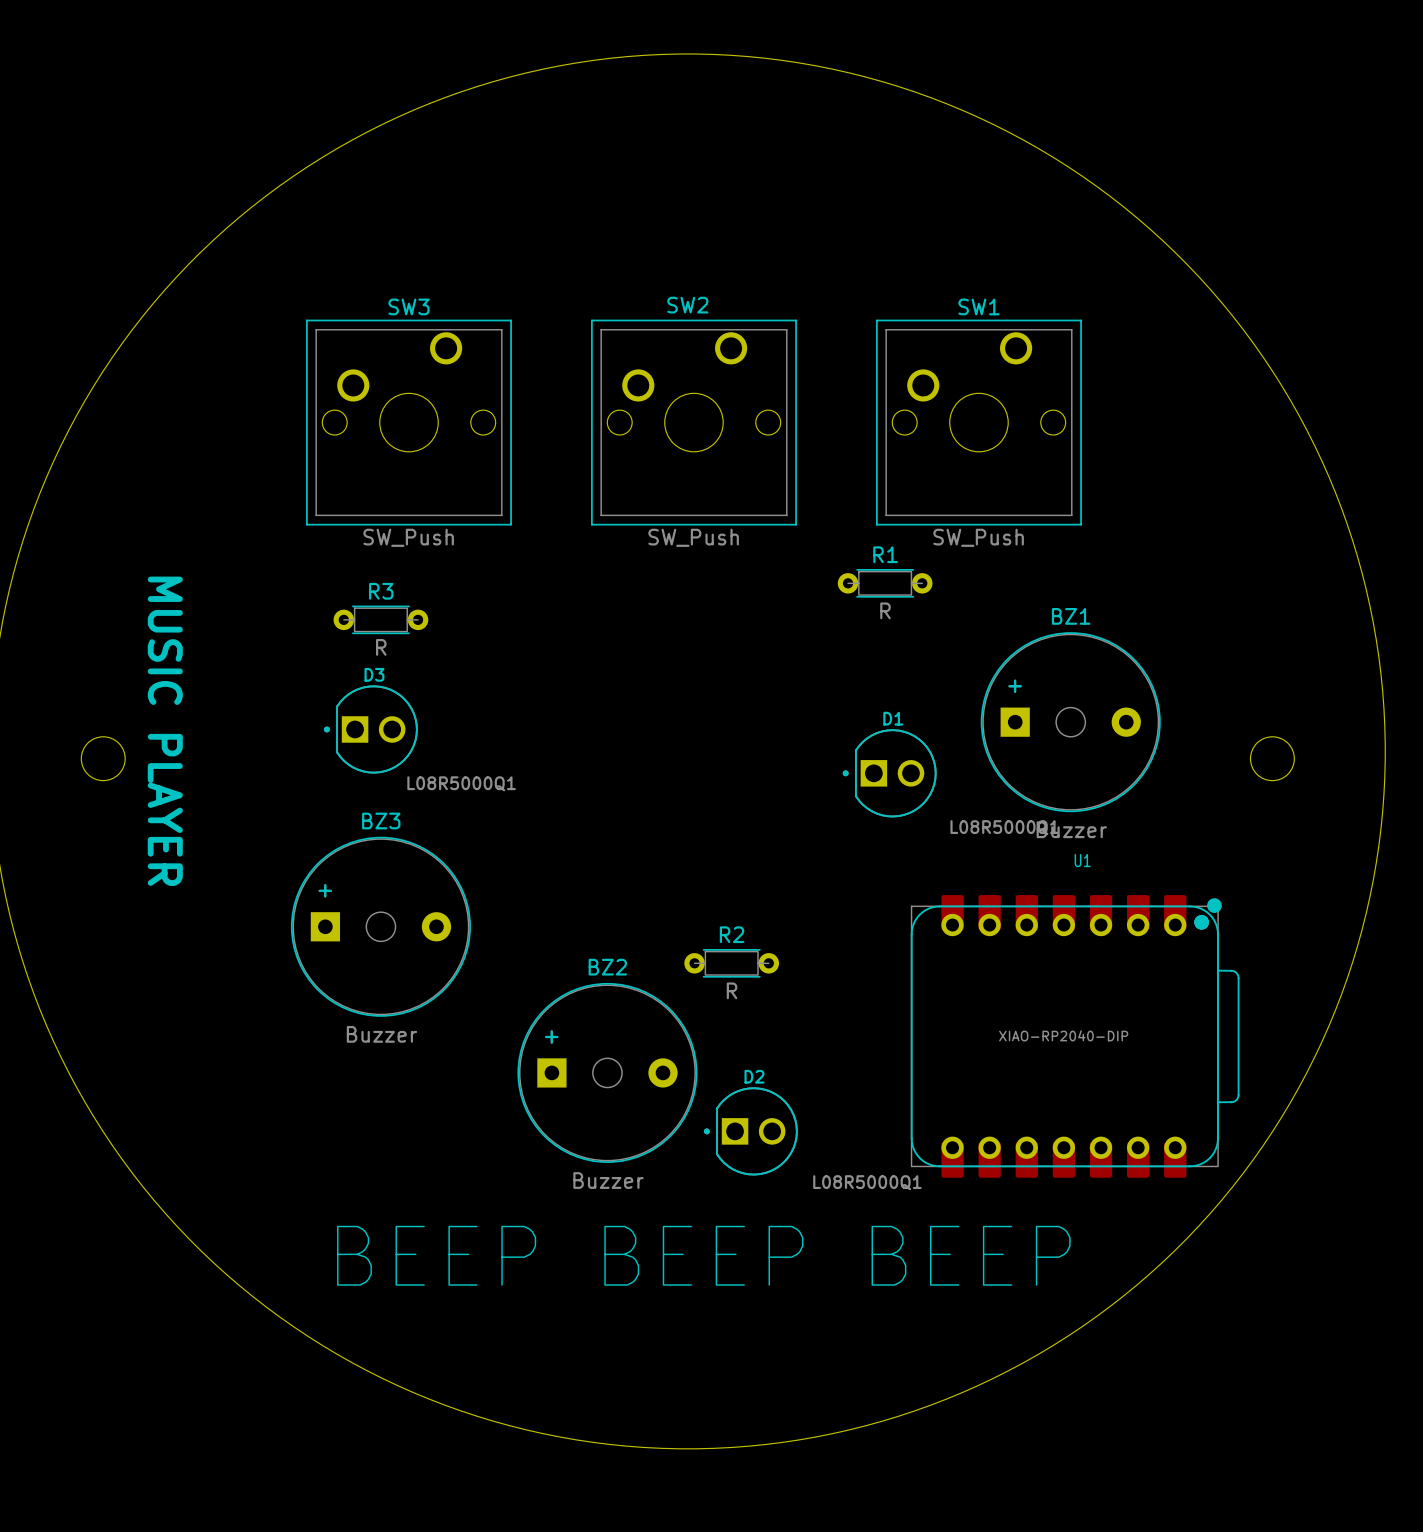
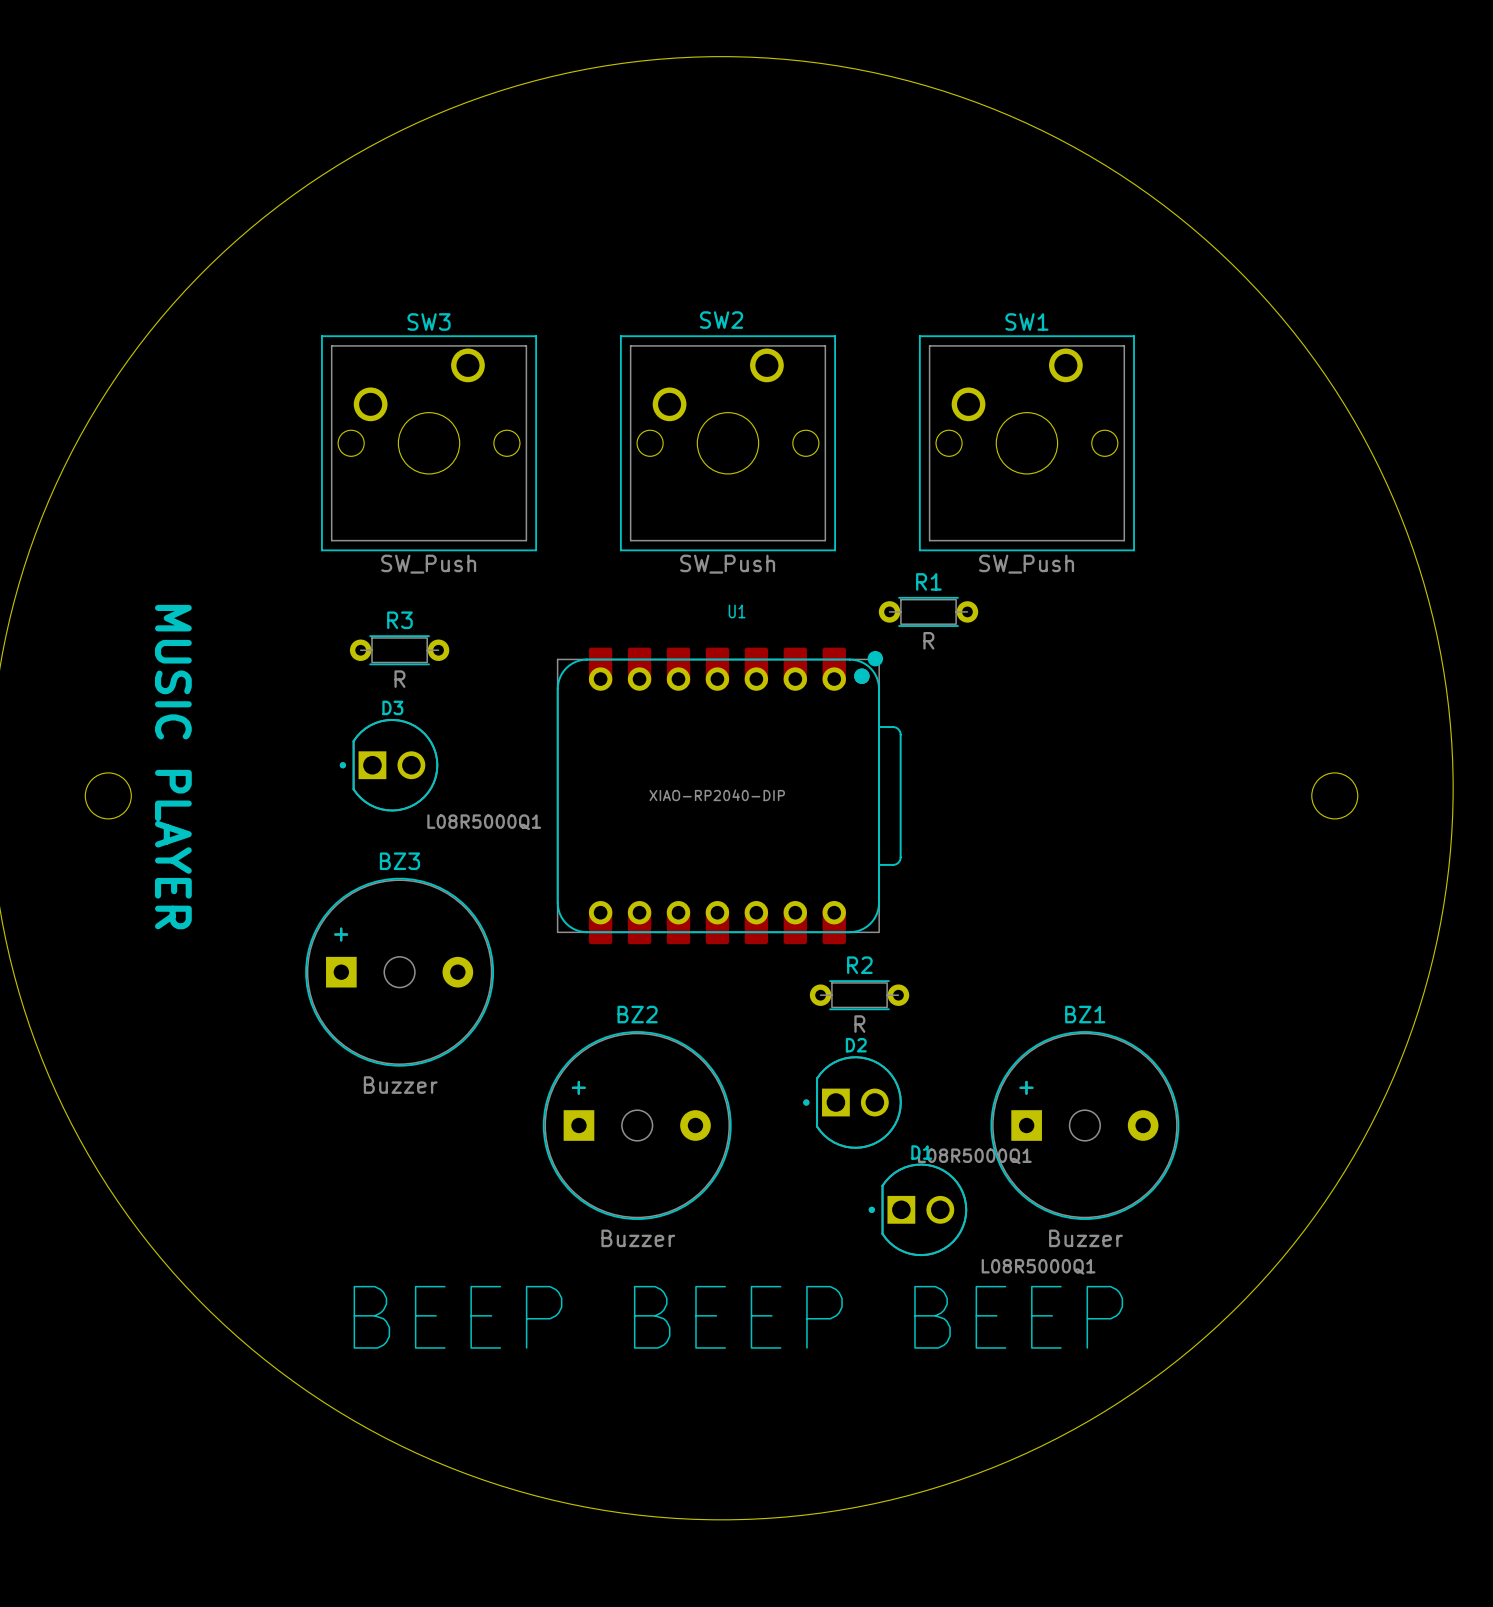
BZ1 position: (1070, 722) -> (1084, 1125)
D1 position: (889, 773) -> (917, 1209)
R2 position: (731, 963) -> (859, 995)
U1 position: (1075, 1036) -> (729, 795)
D2 position: (750, 1131) -> (852, 1102)

